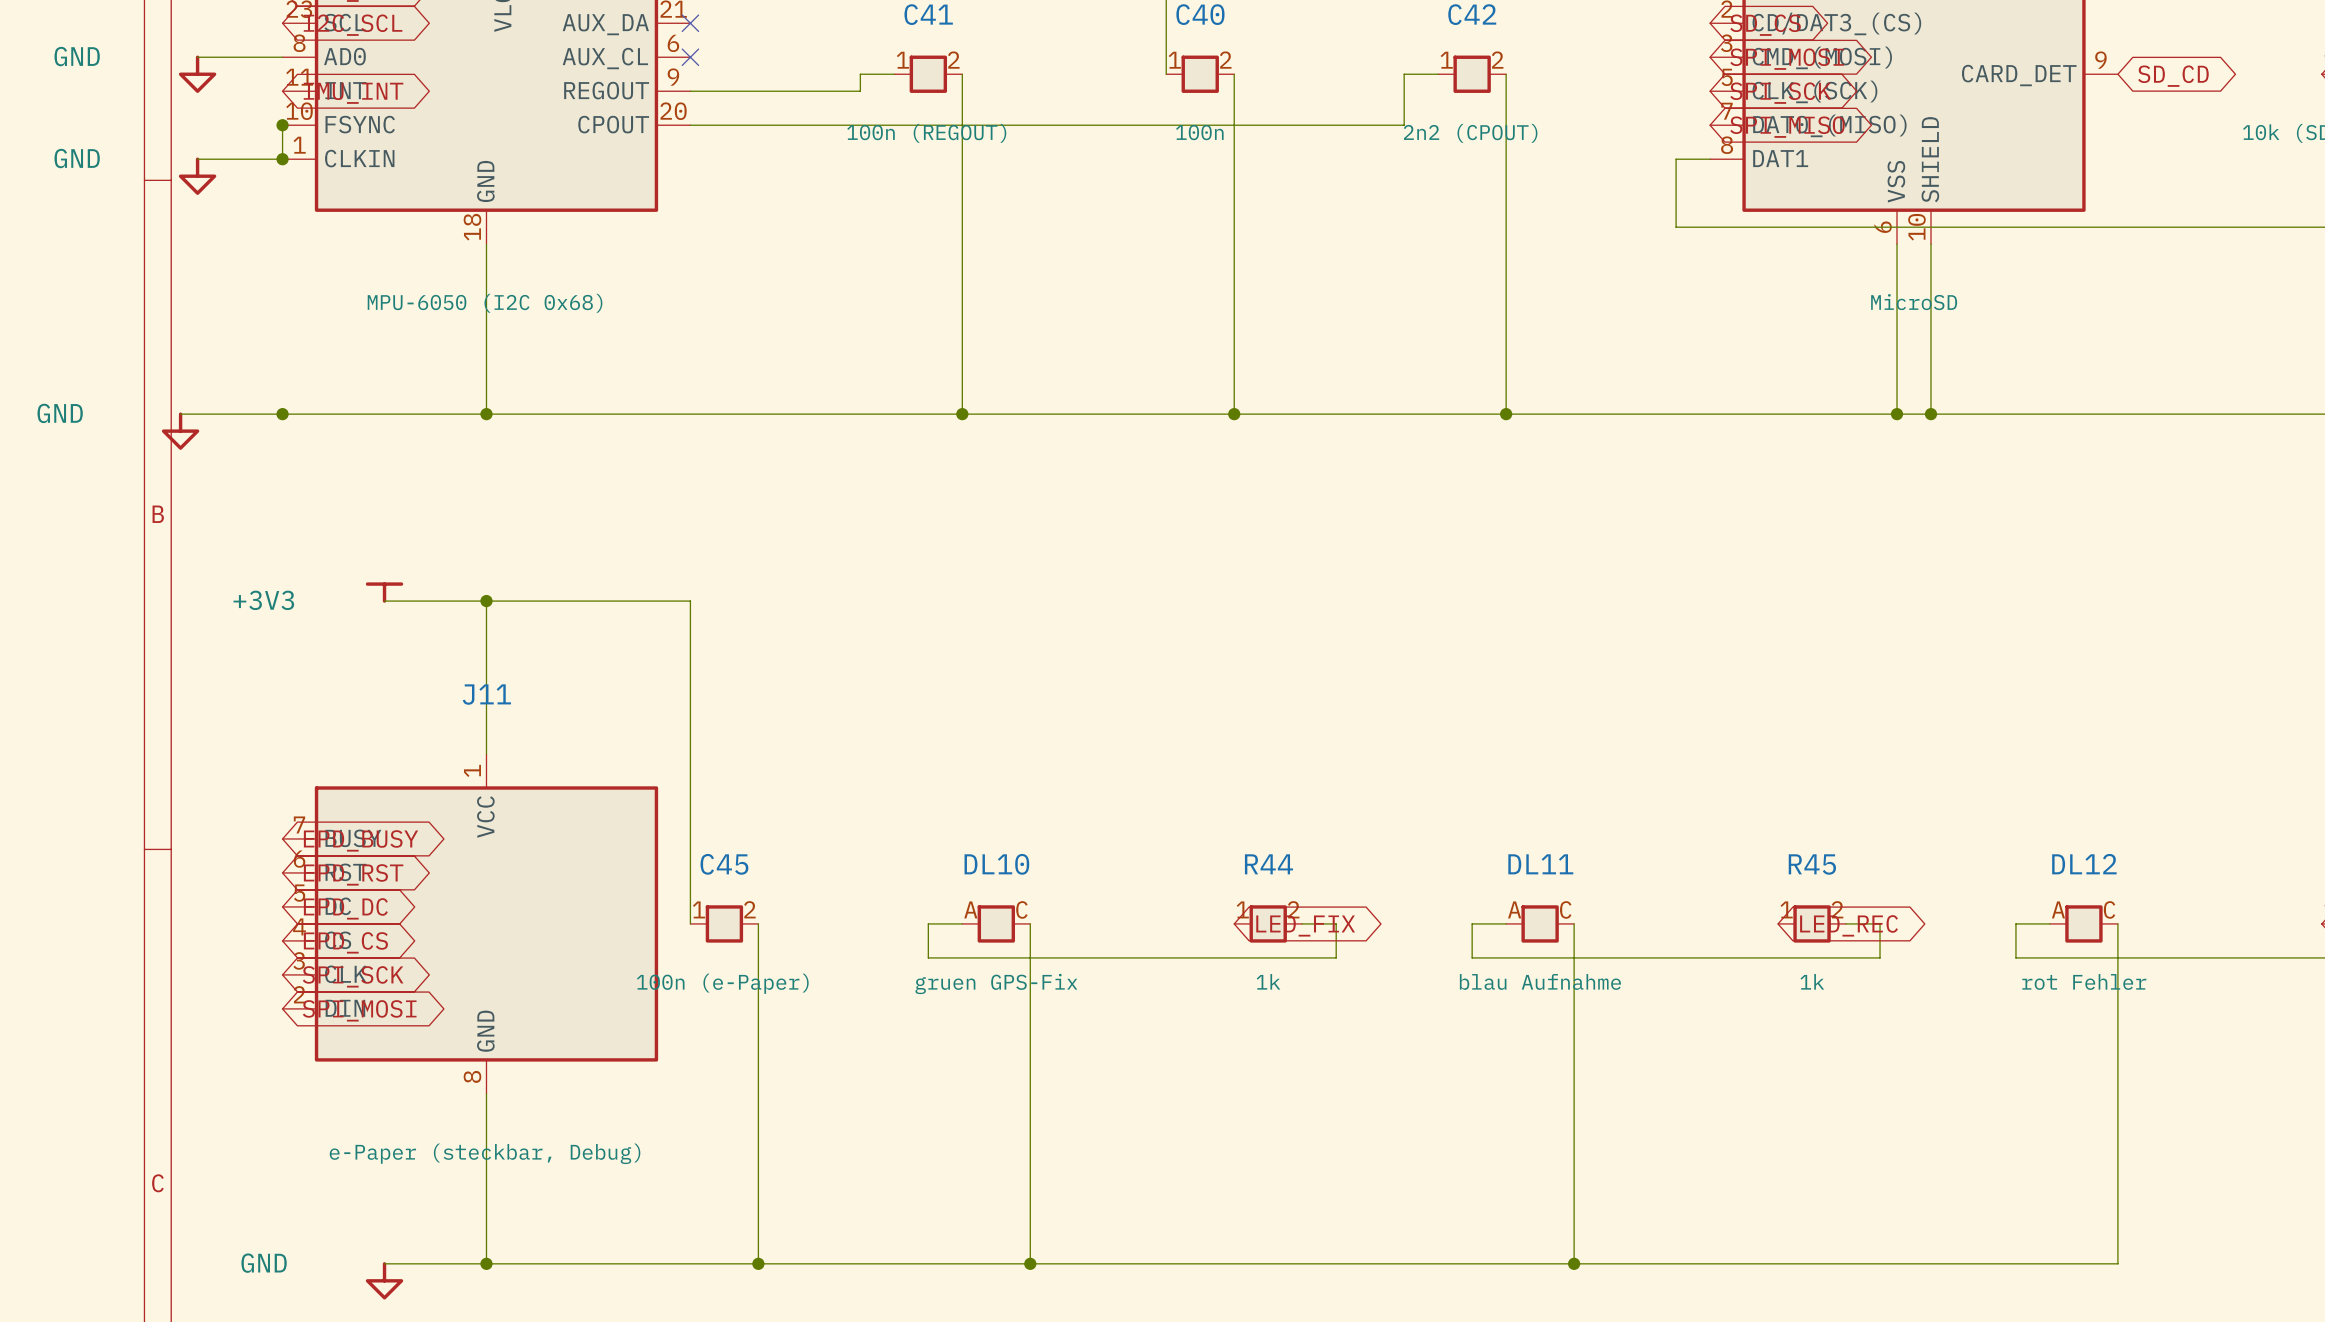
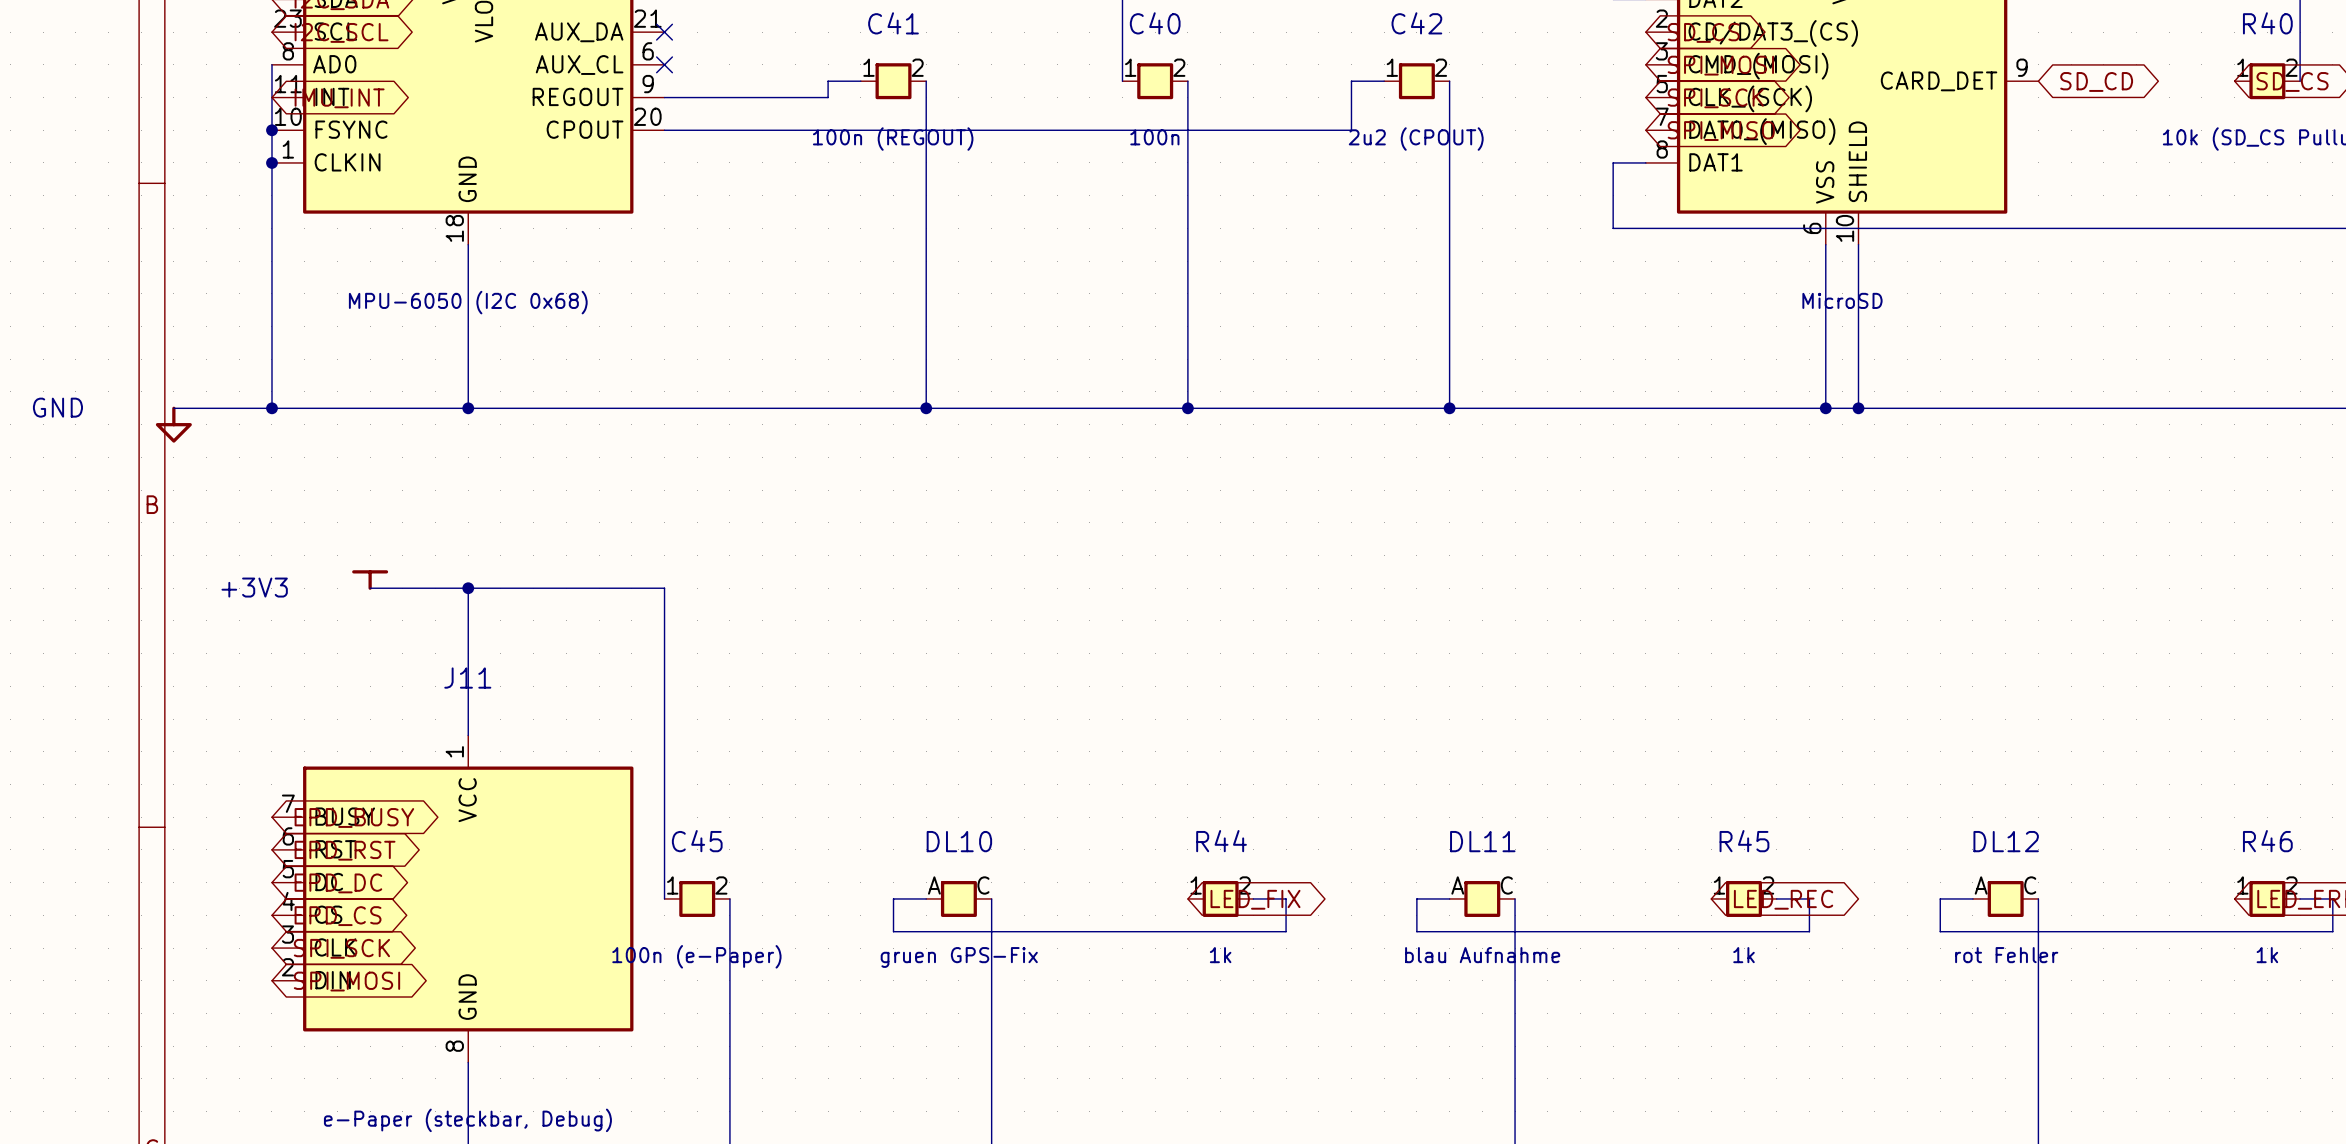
wire: (197, 57) (282, 57) -> (271, 130) (271, 64)
power symbol: GND (197, 74) -> none
C42 value: 2n2 (CPOUT) (1470, 133) -> 2u2 (CPOUT) (1416, 139)
wire: (197, 159) (282, 159) -> (271, 408) (271, 162)
power symbol: GND (197, 176) -> none

